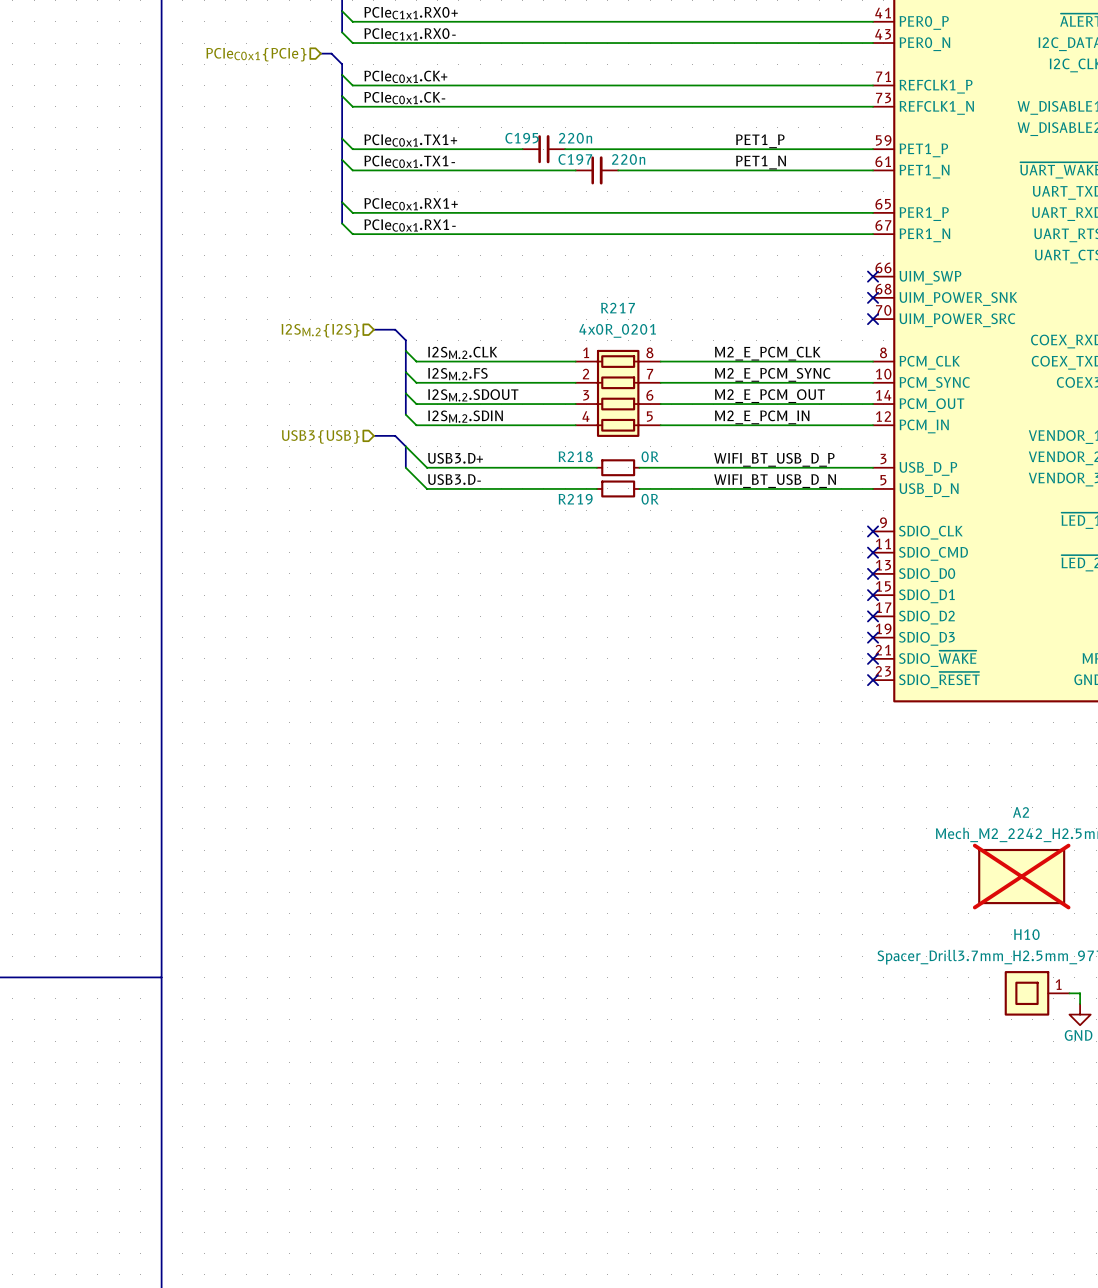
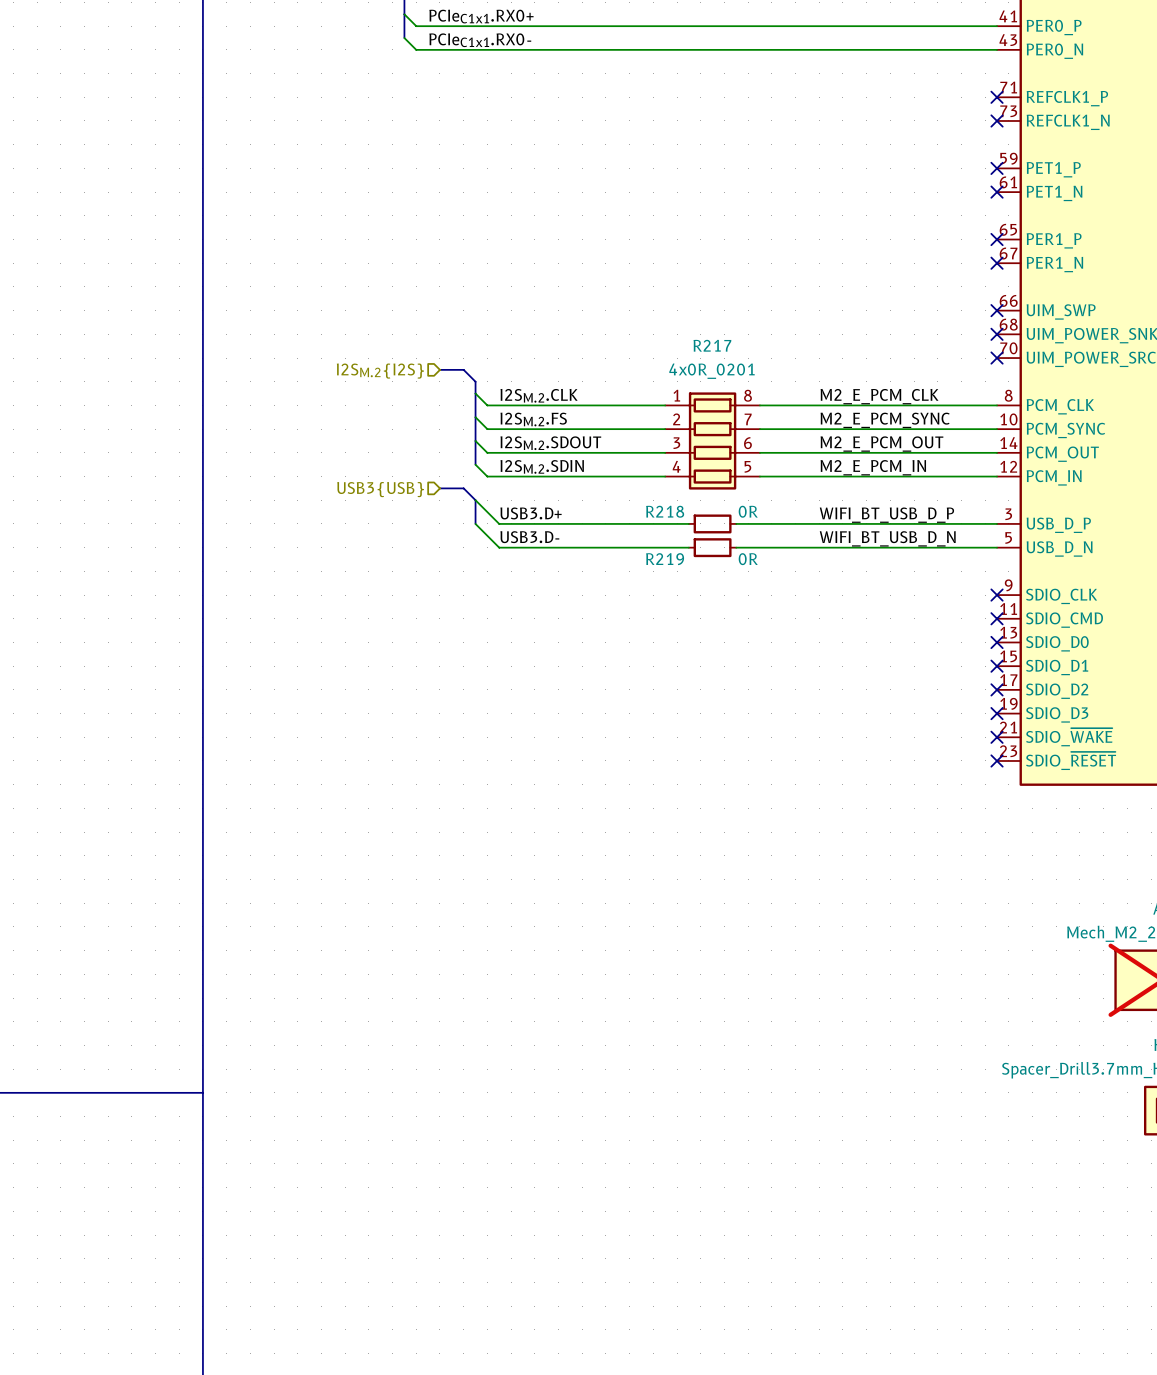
bus: (320, 53) (331, 53) (342, 64) (342, 223) -> none
hierarchical label: PCIeC0x1{PCIe} (256, 54) -> none
wire: (342, 74) (352, 85) (873, 85) -> none
label: PCIeC0x1.CK+ (405, 76) -> none
no-connect mark: none -> (997, 97)
wire: (342, 96) (352, 106) (873, 106) -> none
label: PCIeC0x1.CK- (404, 98) -> none
no-connect mark: none -> (997, 120)
wire: (342, 138) (352, 149) (522, 149) -> none
label: PCIeC0x1.TX1+ (410, 140) -> none
label: PET1_P (760, 141) -> none
C195: (543, 149) -> none
wire: (565, 149) (873, 149) -> none
no-connect mark: none -> (997, 168)
wire: (342, 159) (352, 170) (575, 170) -> none
label: PCIeC0x1.TX1- (409, 161) -> none
label: PET1_N (761, 162) -> none
C197: (596, 170) -> none
wire: (618, 170) (873, 170) -> none
no-connect mark: none -> (997, 192)
wire: (342, 202) (352, 212) (873, 212) -> none
label: PCIeC0x1.RX1+ (411, 204) -> none
no-connect mark: none -> (997, 239)
wire: (342, 223) (352, 234) (873, 234) -> none
label: PCIeC0x1.RX1- (410, 225) -> none
no-connect mark: none -> (997, 263)

